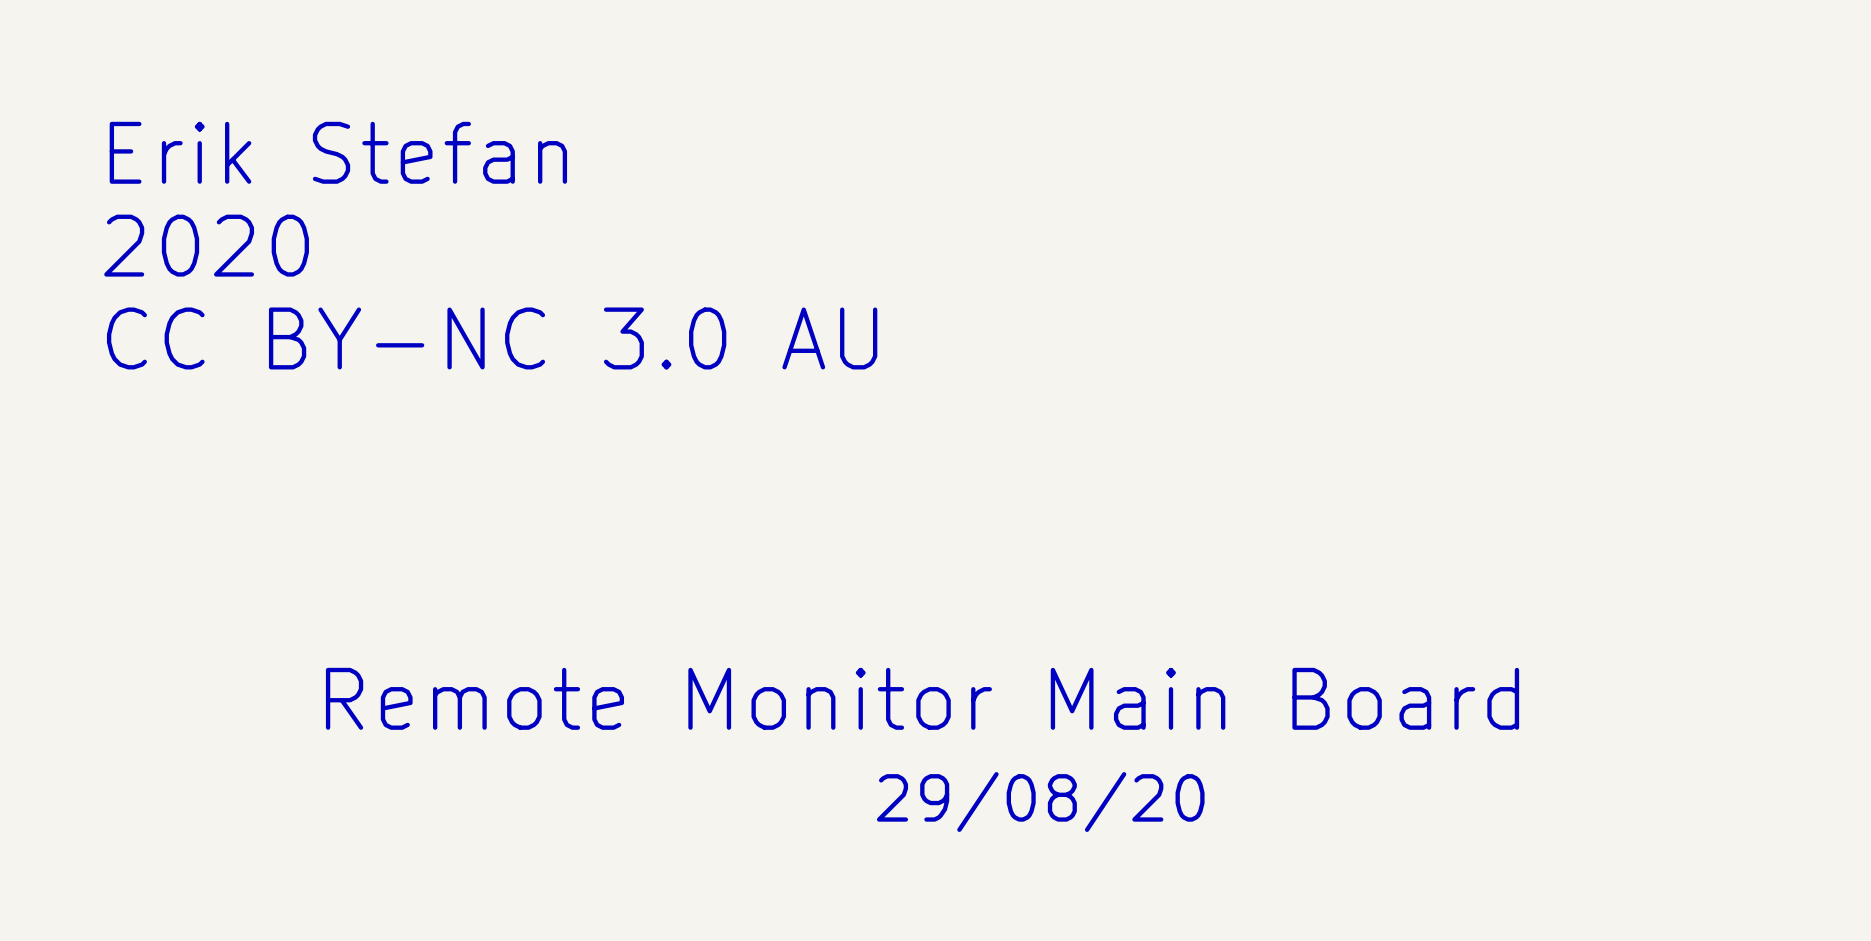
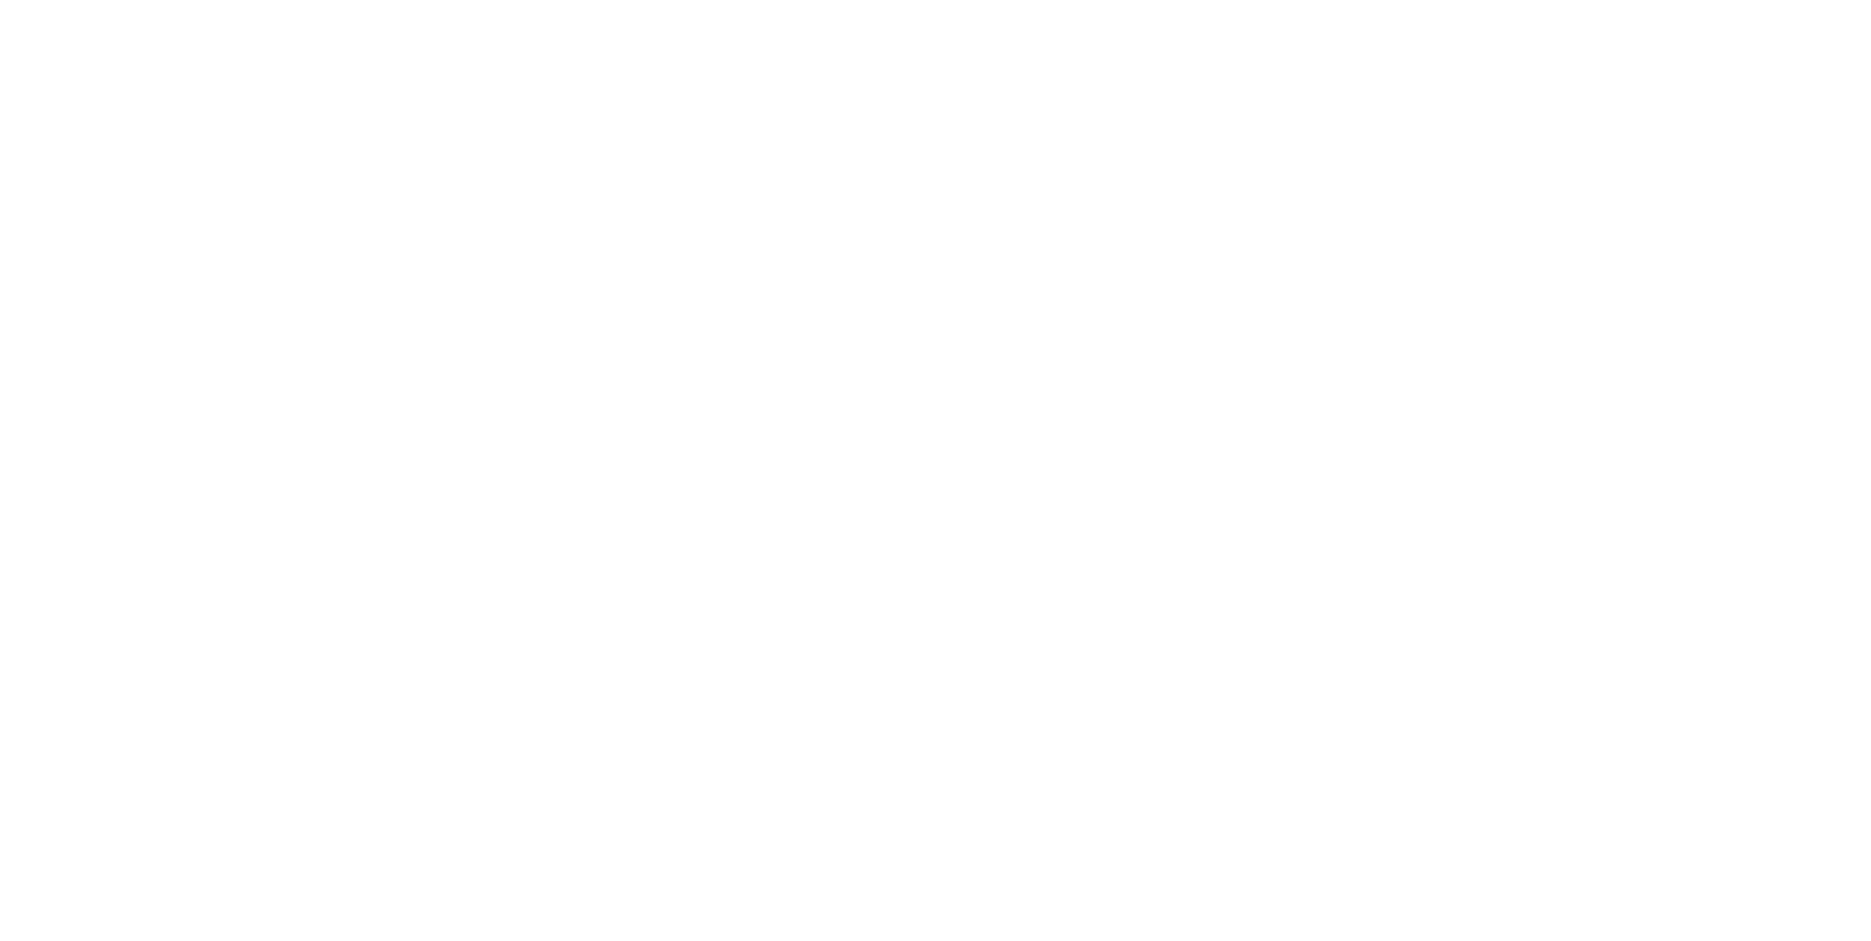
text: Erik Stefan (338, 152) -> none
text: 2020 (206, 245) -> none
text: CC BY-NC 3.0 AU (492, 338) -> none
text: Remote Monitor Main Board (922, 698) -> none
text: 29/08/20 (1040, 802) -> none

